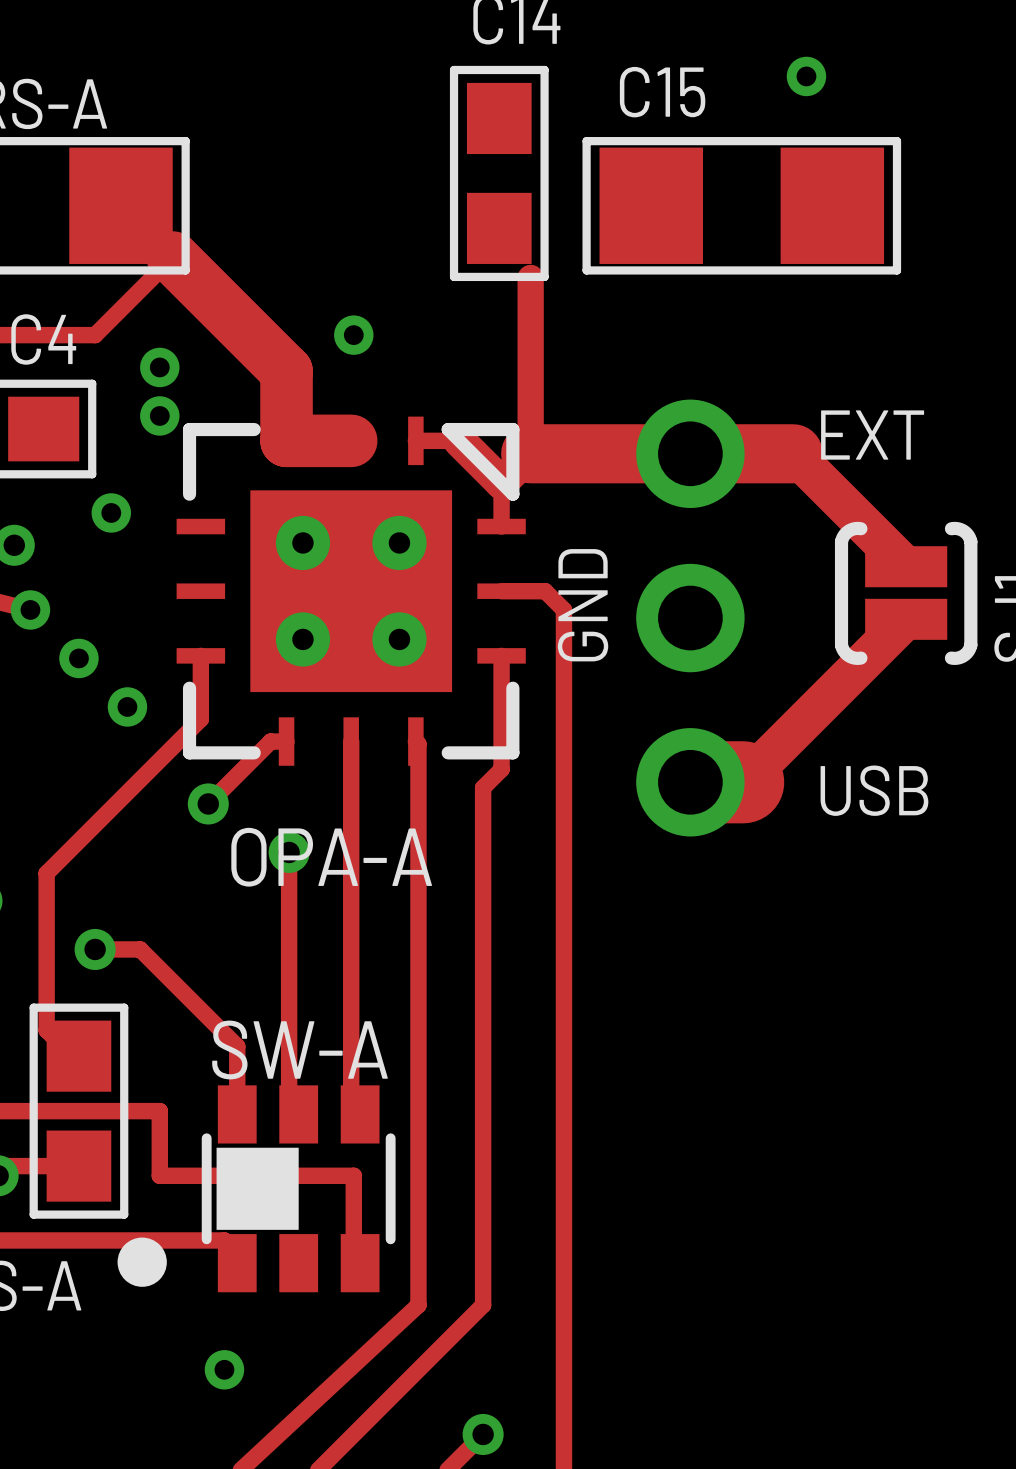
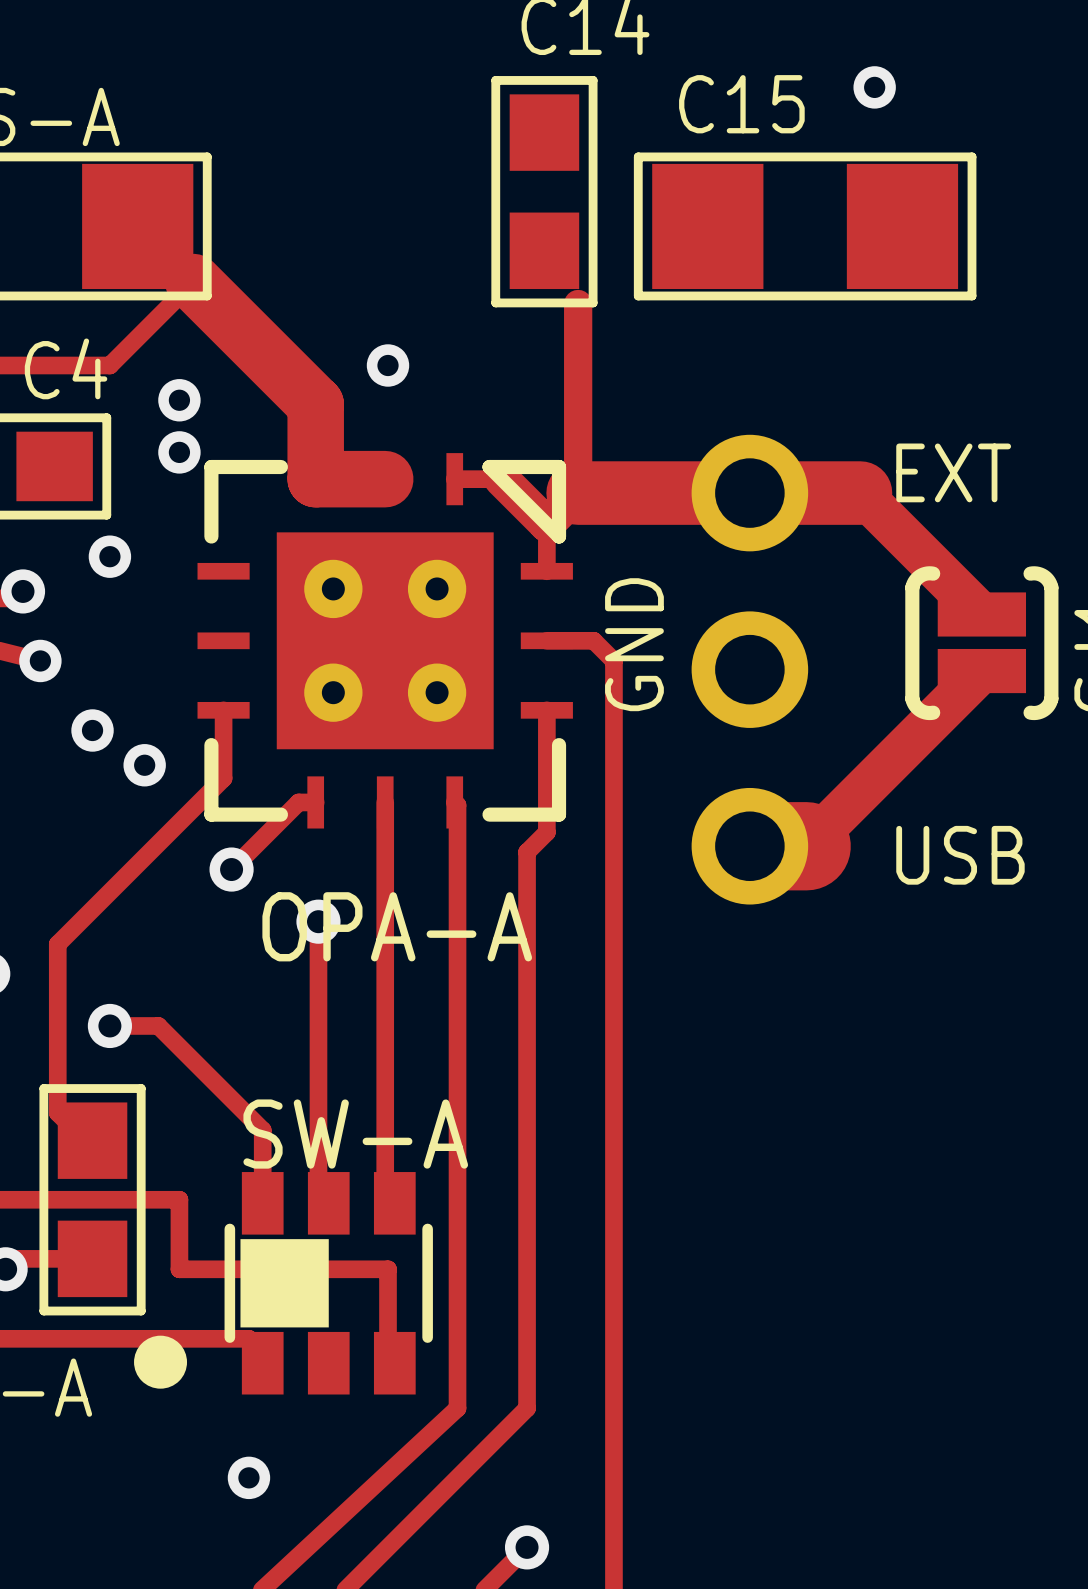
via position: (111, 512) -> (109, 556)
via position: (78, 658) -> (92, 730)

